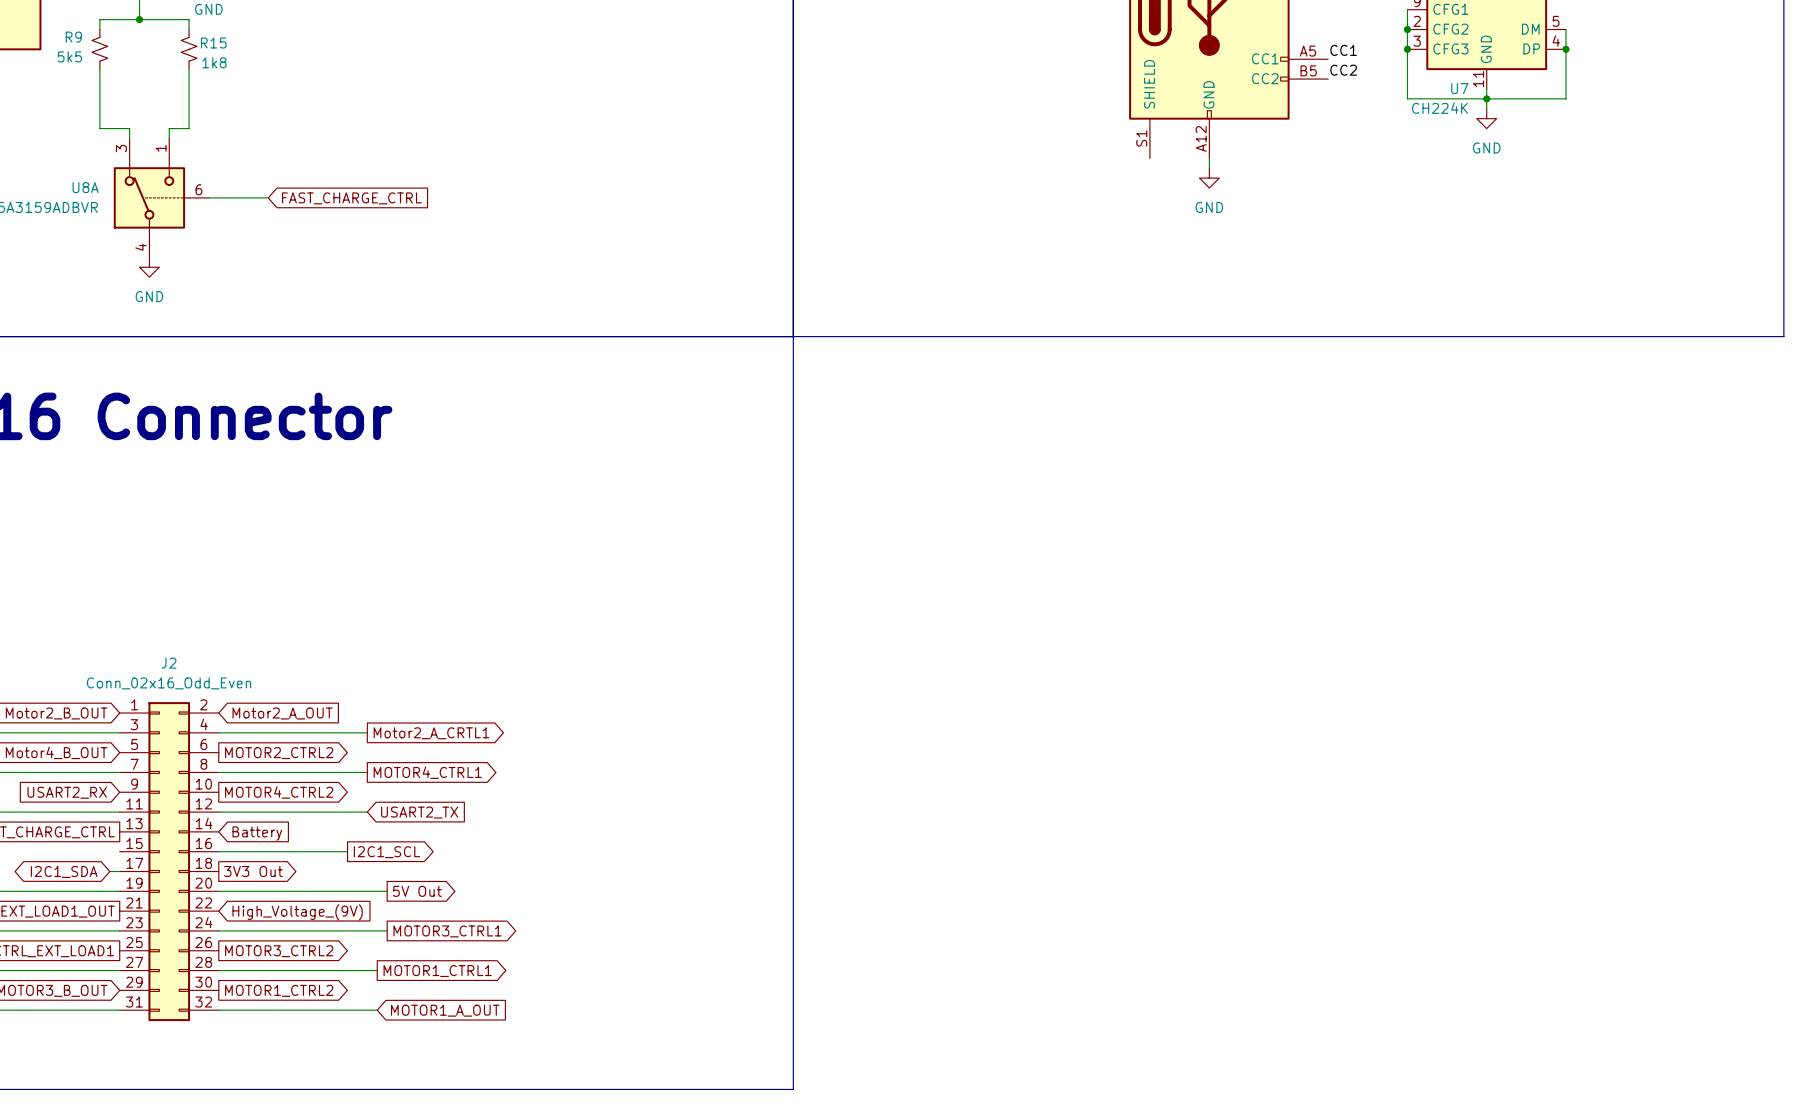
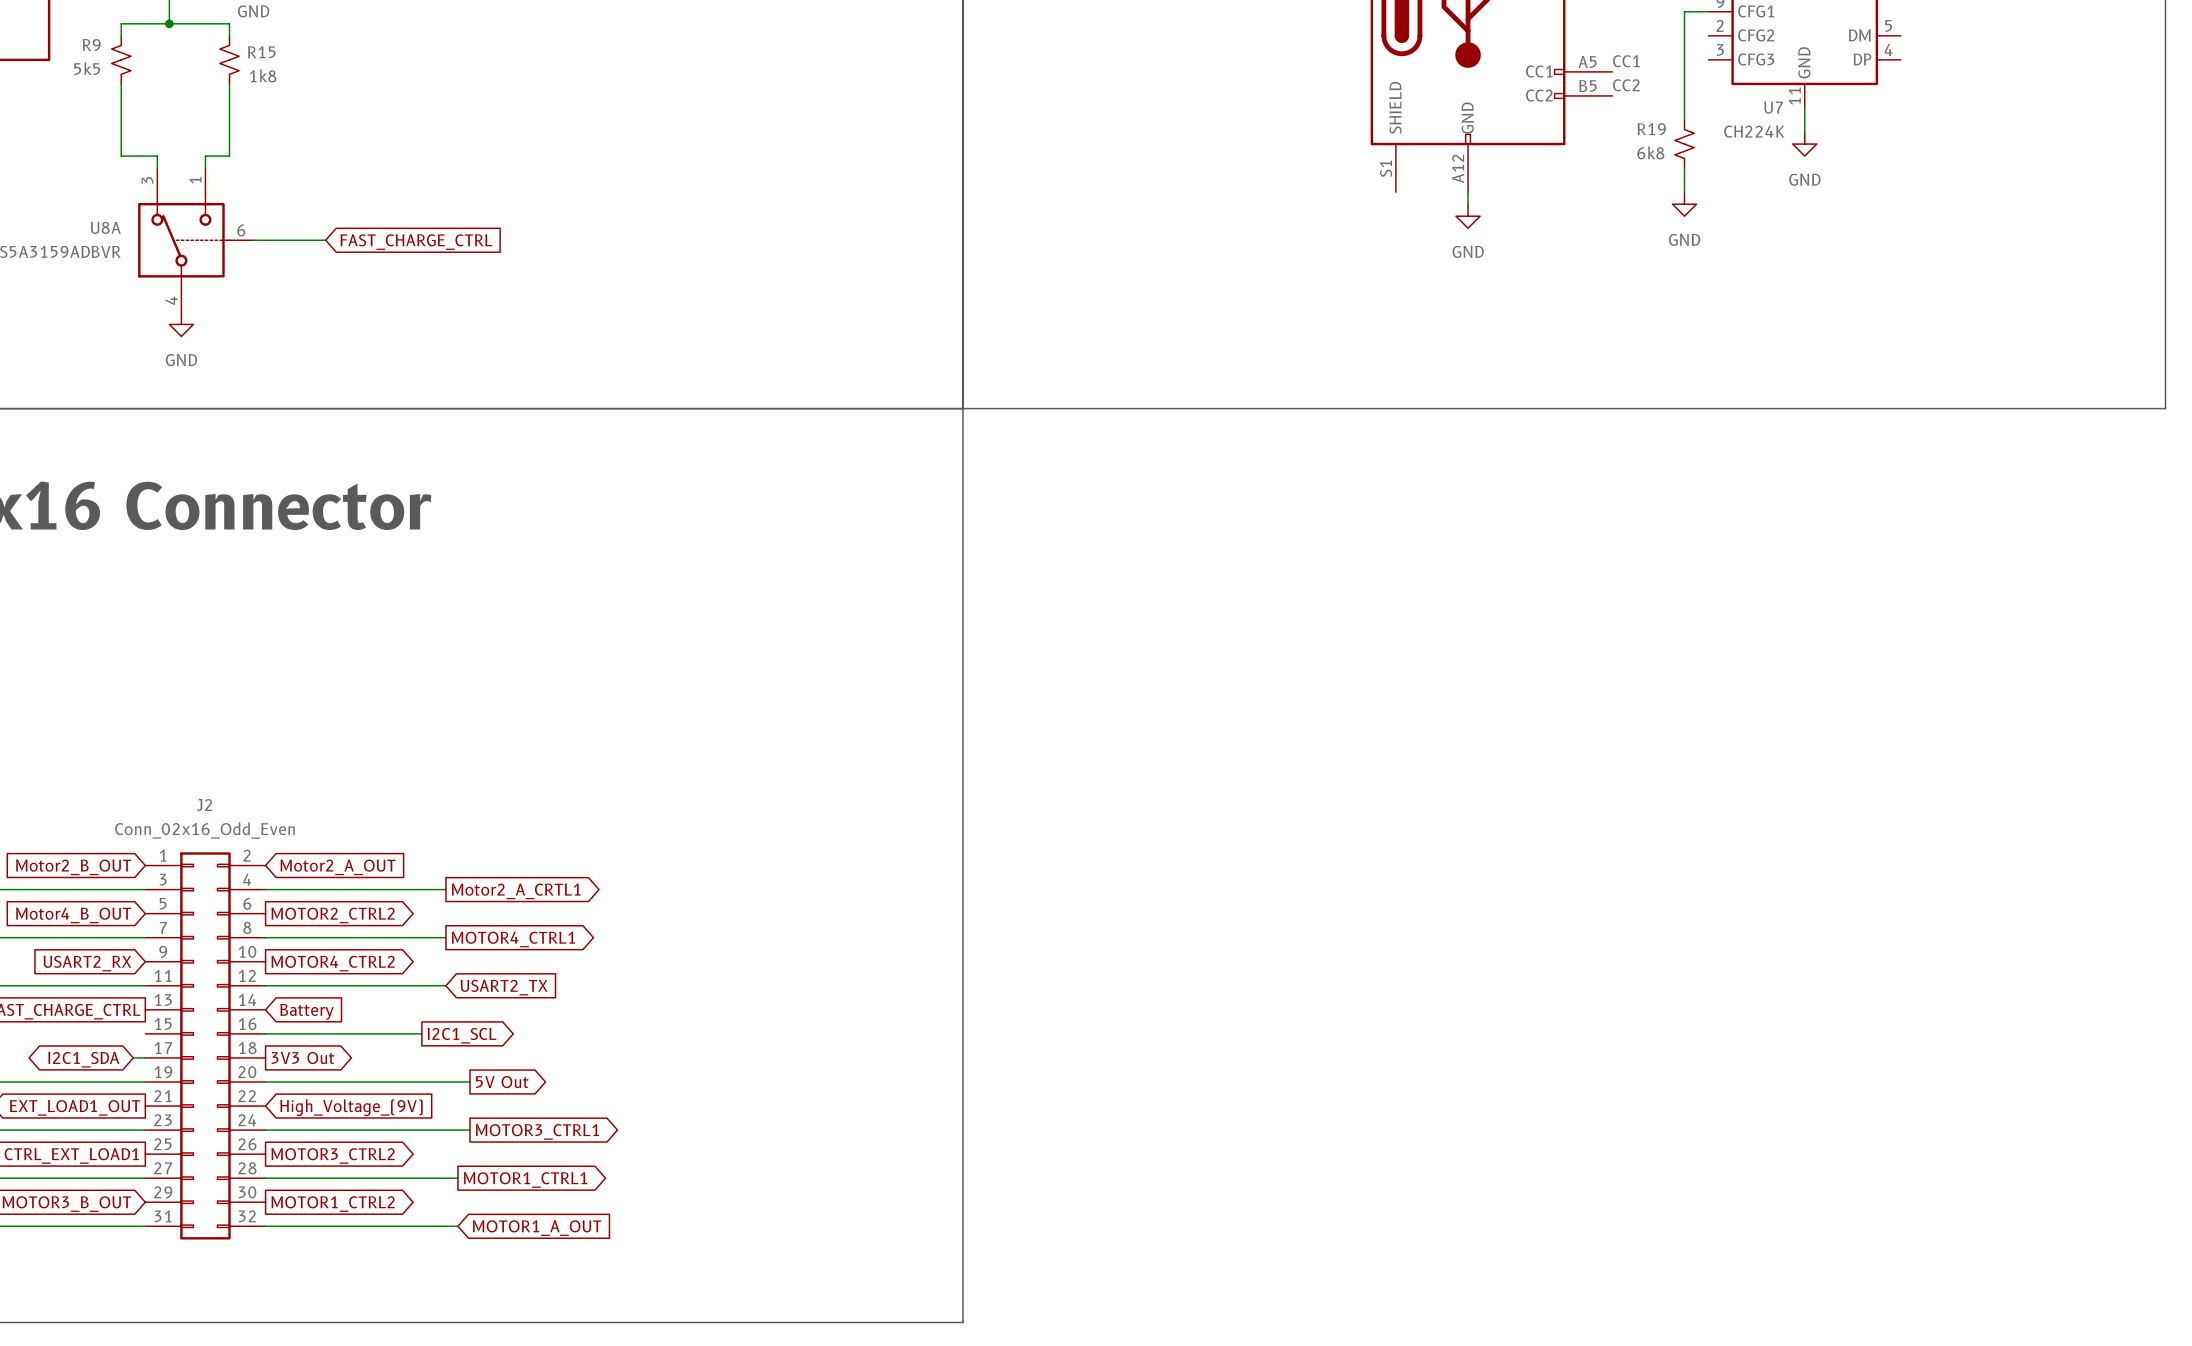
wire: (1407, 9) (1407, 98) (1565, 98) (1565, 29) -> (1708, 11) (1684, 11) (1684, 120)
junction: (1407, 29) -> none
junction: (1407, 49) -> none
junction: (1565, 49) -> none
junction: (1486, 98) -> none
R19: none -> 6k8 (1684, 144)
wire: none -> (1684, 168) (1684, 192)
power symbol: none -> GND (1684, 204)

